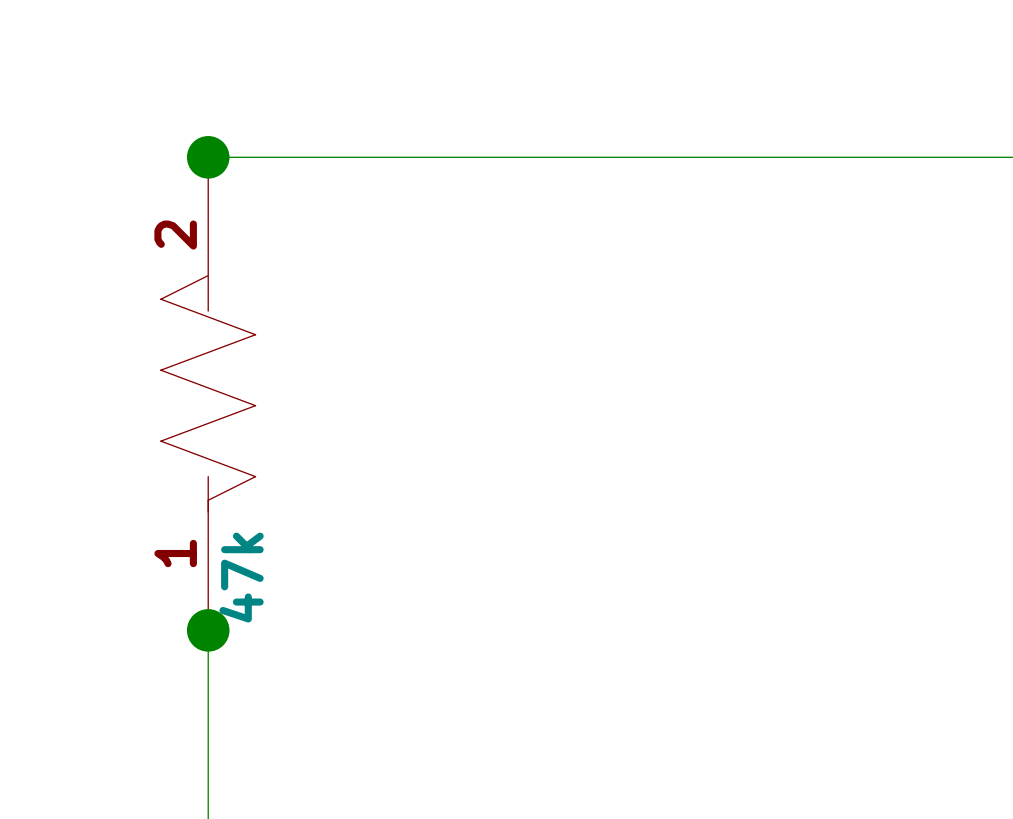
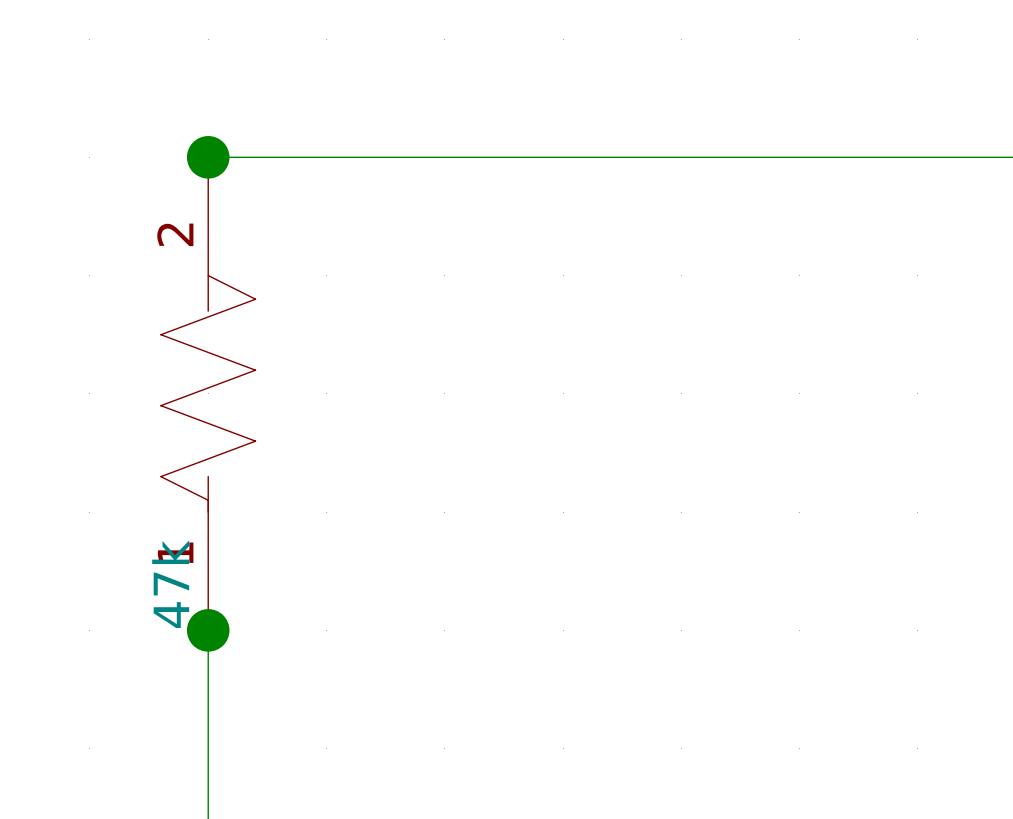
part flip: as is (208, 393) -> left-right (208, 393)

